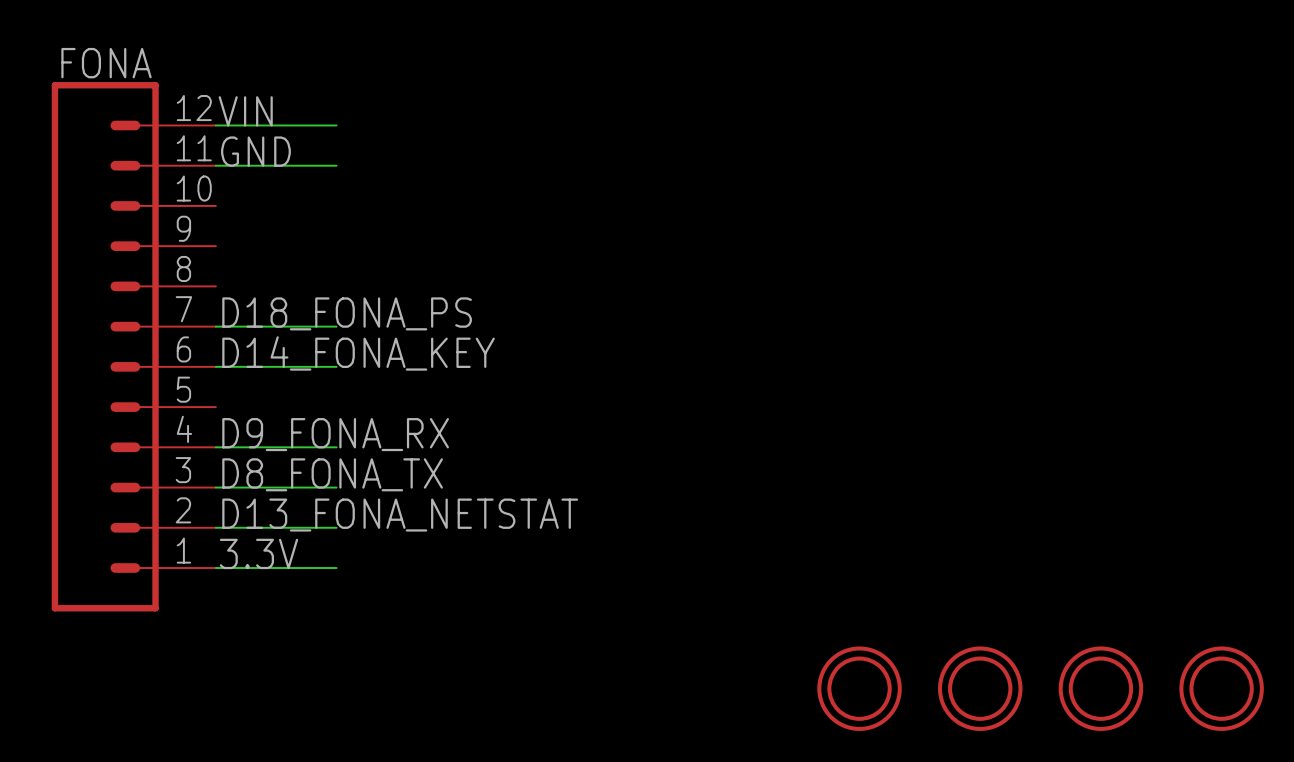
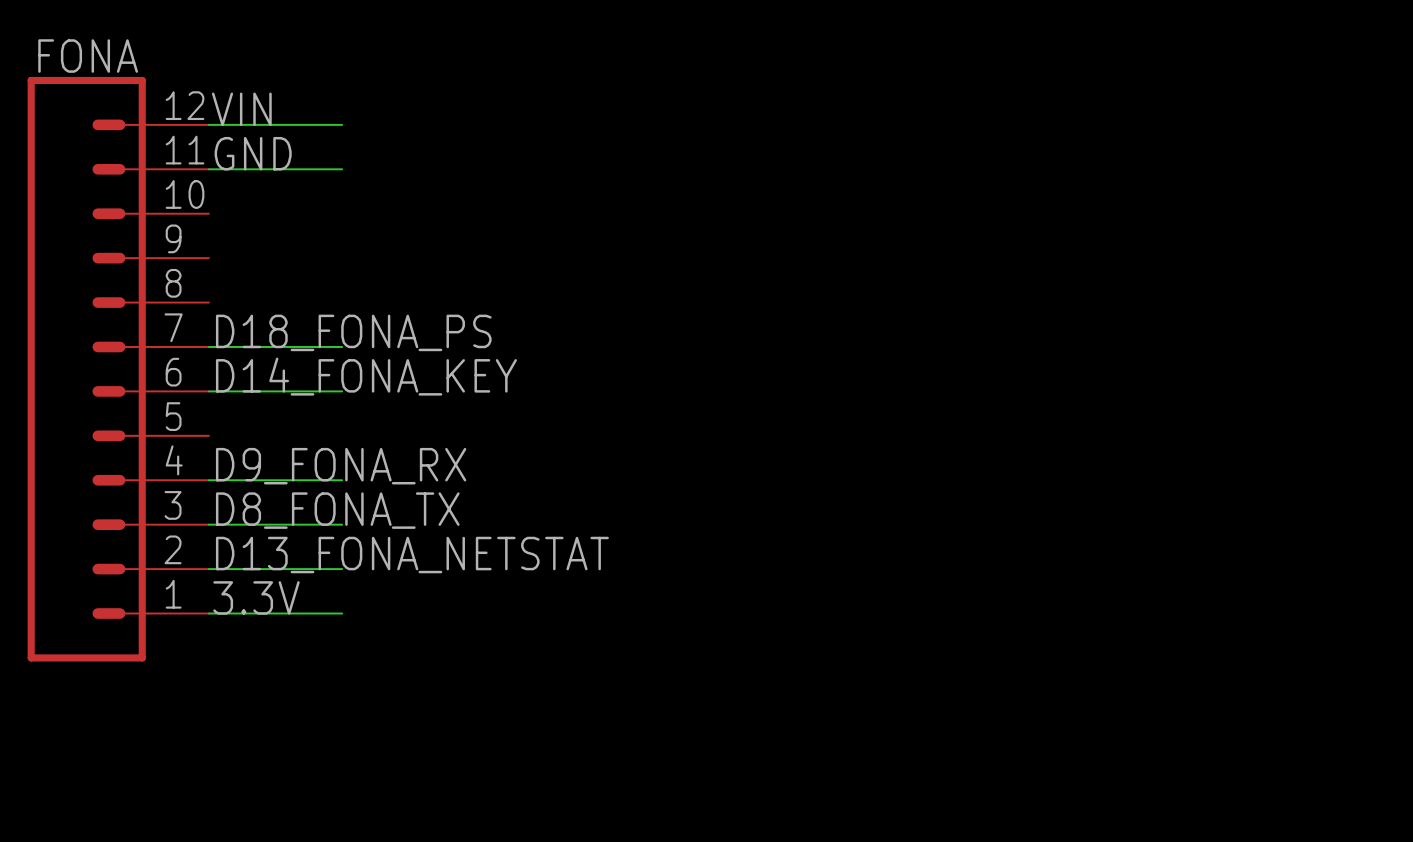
part: (859, 688) -> none
part: (980, 688) -> none
part: (1100, 688) -> none
part: (1221, 688) -> none

